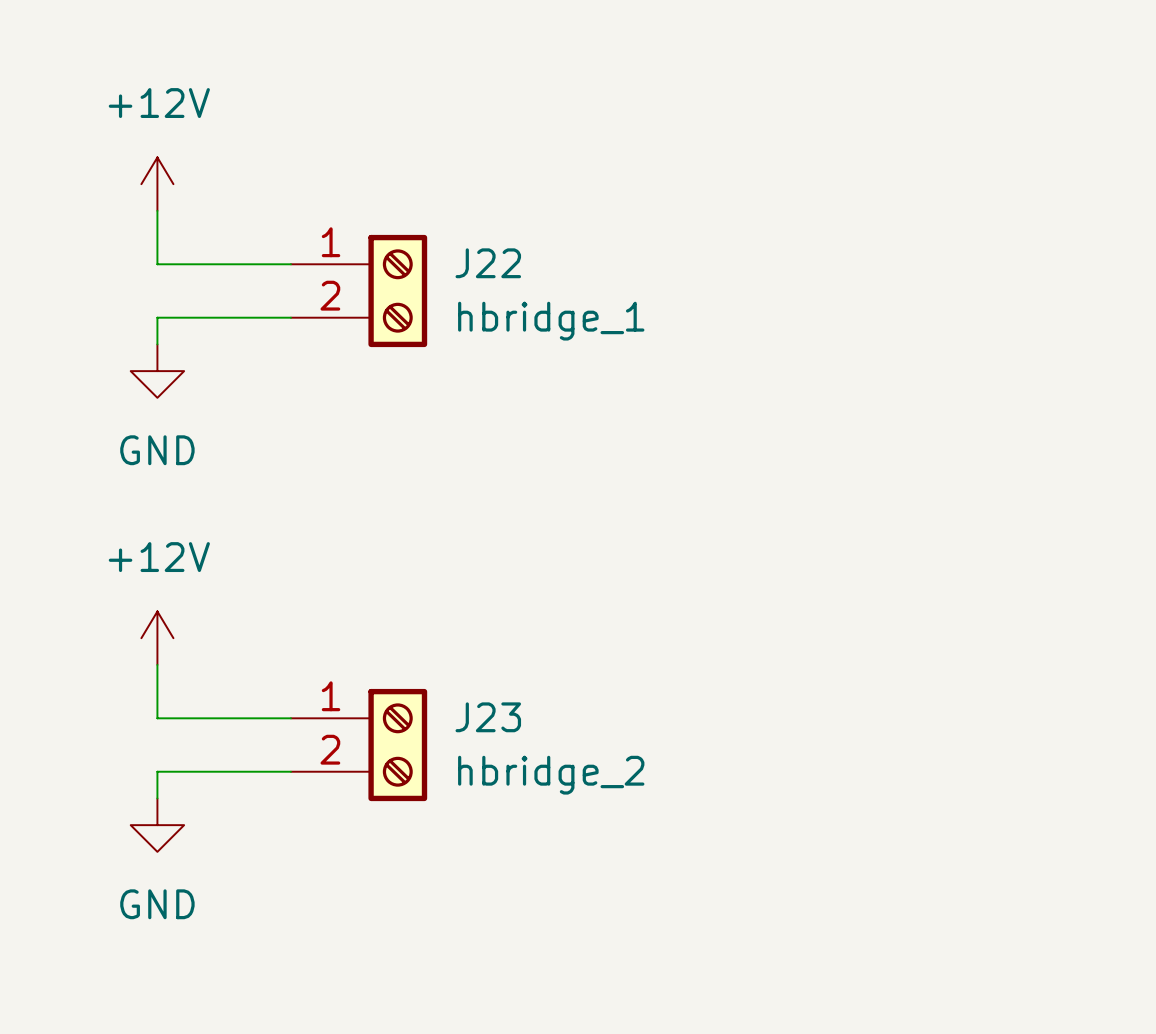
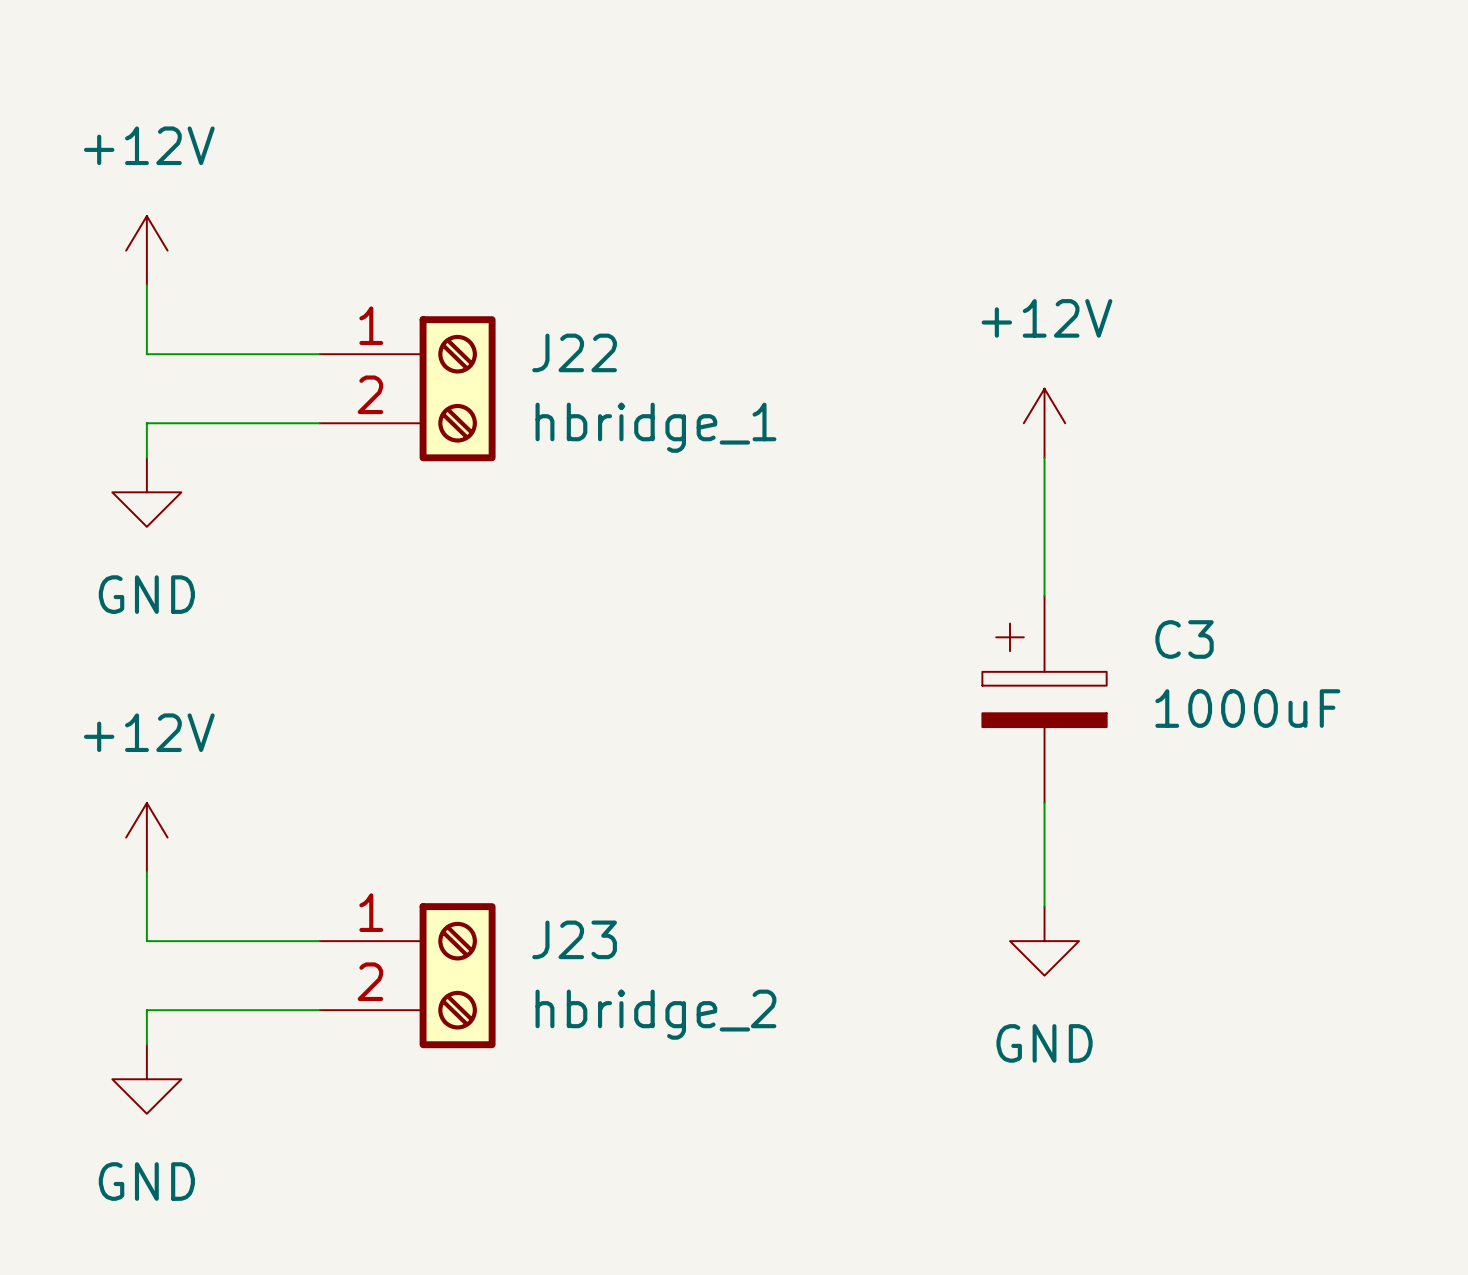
power symbol: none -> +12V (1044, 423)
wire: none -> (1044, 457) (1044, 595)
C3: none -> 1000uF (1044, 699)
wire: none -> (1044, 803) (1044, 906)
power symbol: none -> GND (1044, 941)

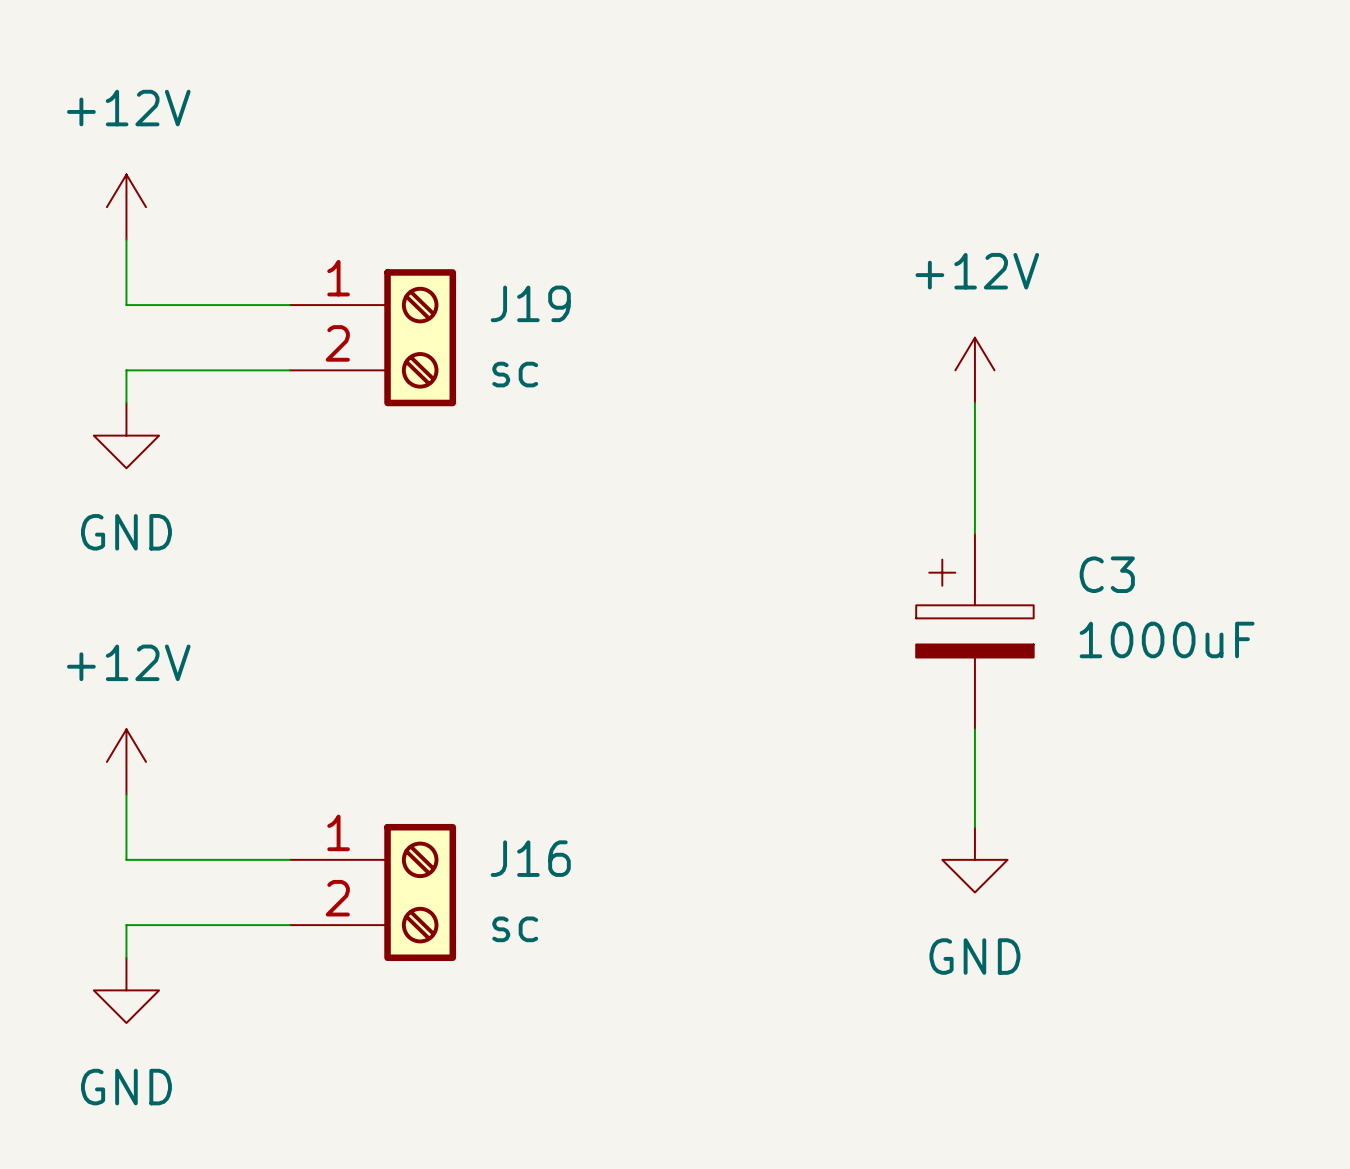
J22 name: J22 (574, 352) -> J19 (530, 303)
J22 value: hbridge_1 (655, 427) -> sc (515, 374)
J23 name: J23 (574, 939) -> J16 (530, 858)
J23 value: hbridge_2 (655, 1014) -> sc (515, 929)

